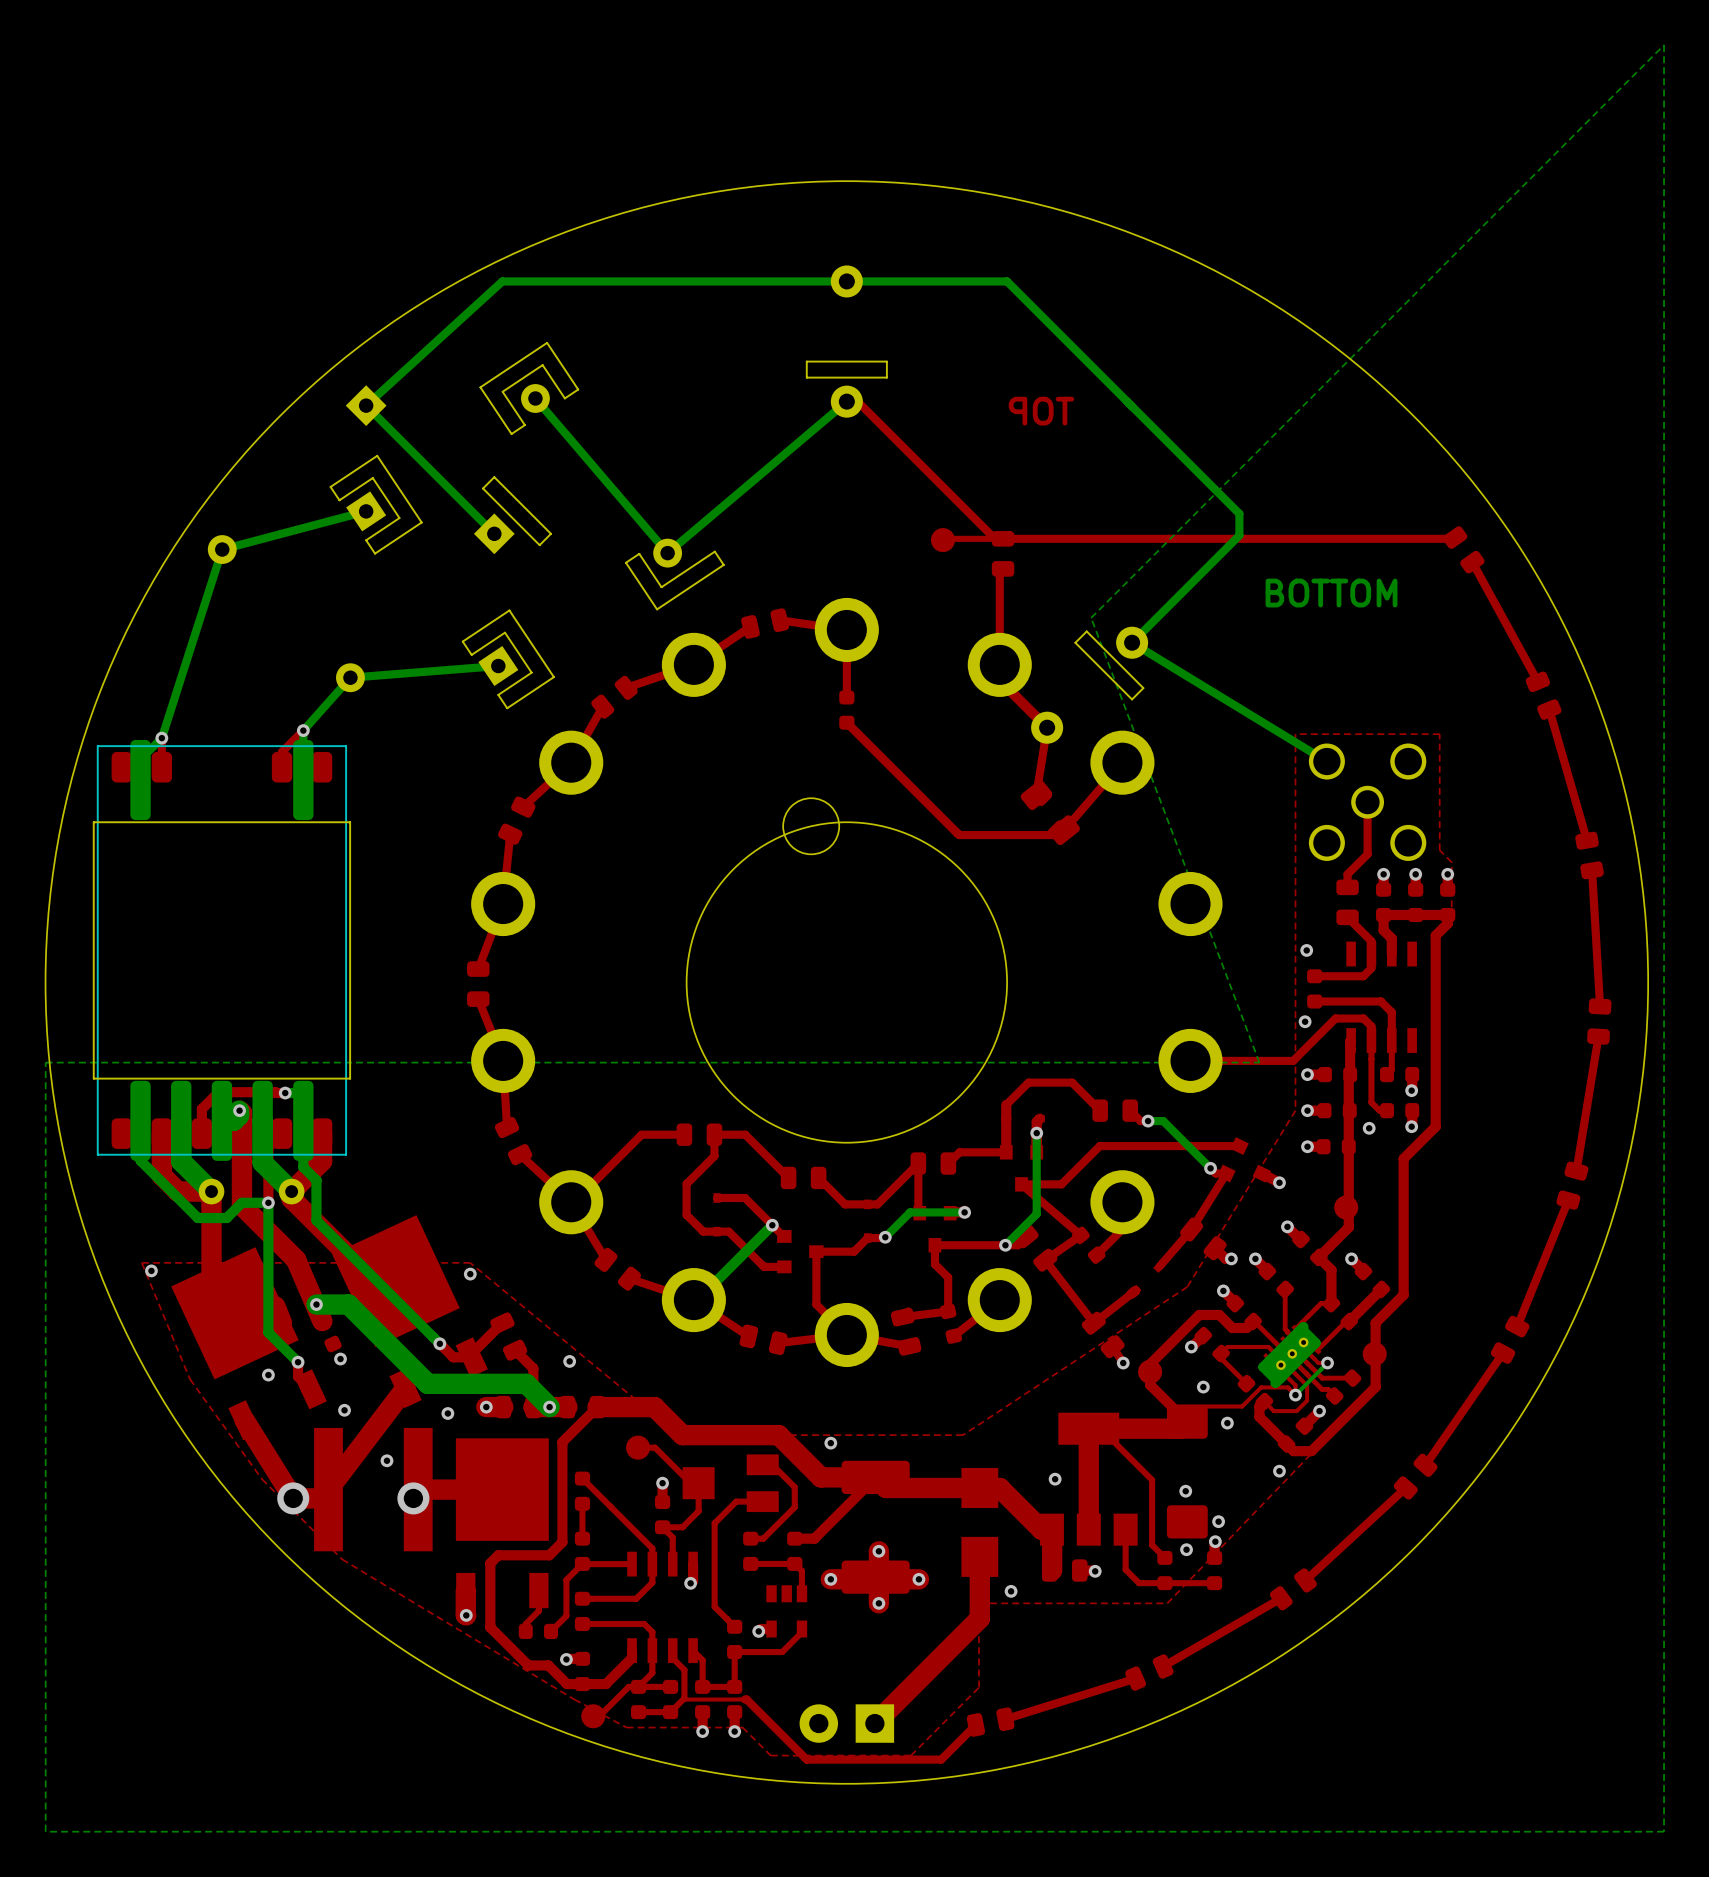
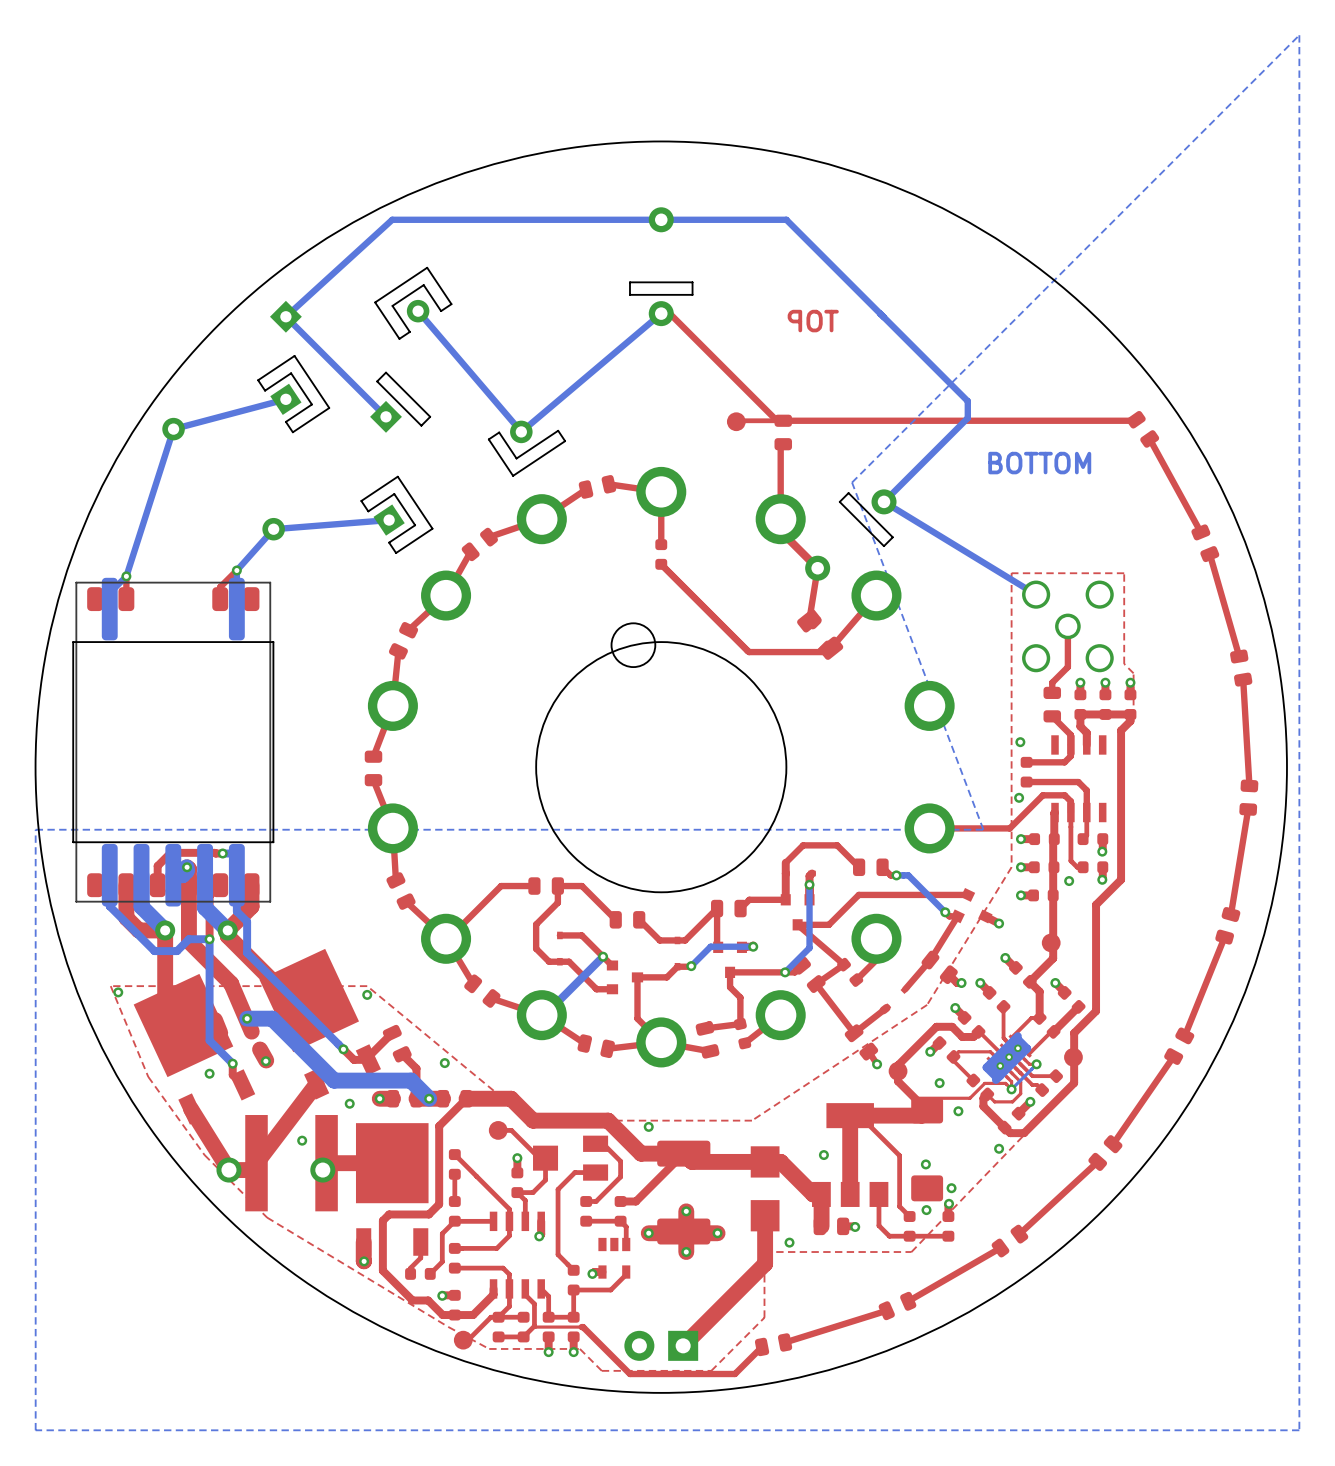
top track: none -> (260, 1049) (266, 1060)
via: (344, 1410) -> none

